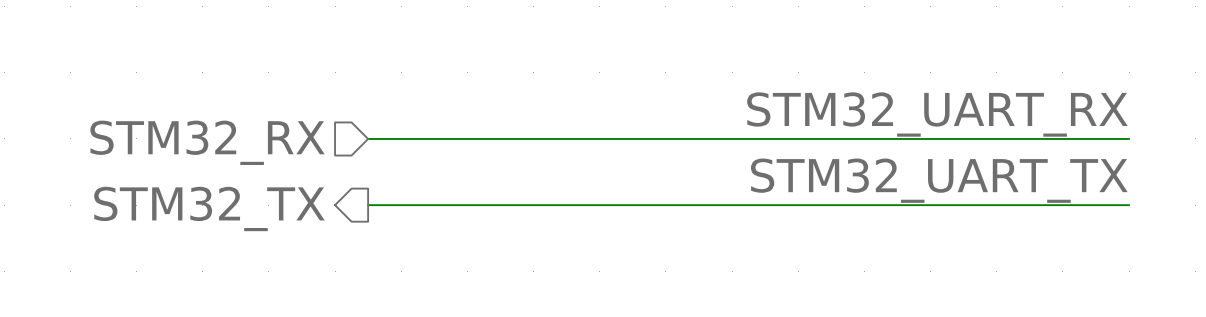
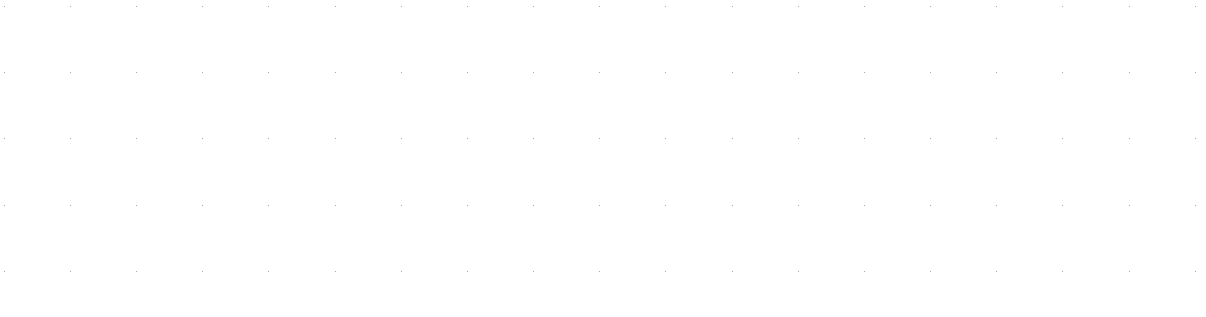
label: STM32_UART_RX (937, 114) -> none
wire: (368, 138) (1129, 138) -> none
hierarchical label: STM32_RX (207, 142) -> none
label: STM32_UART_TX (939, 180) -> none
wire: (368, 205) (1129, 205) -> none
hierarchical label: STM32_TX (209, 208) -> none

